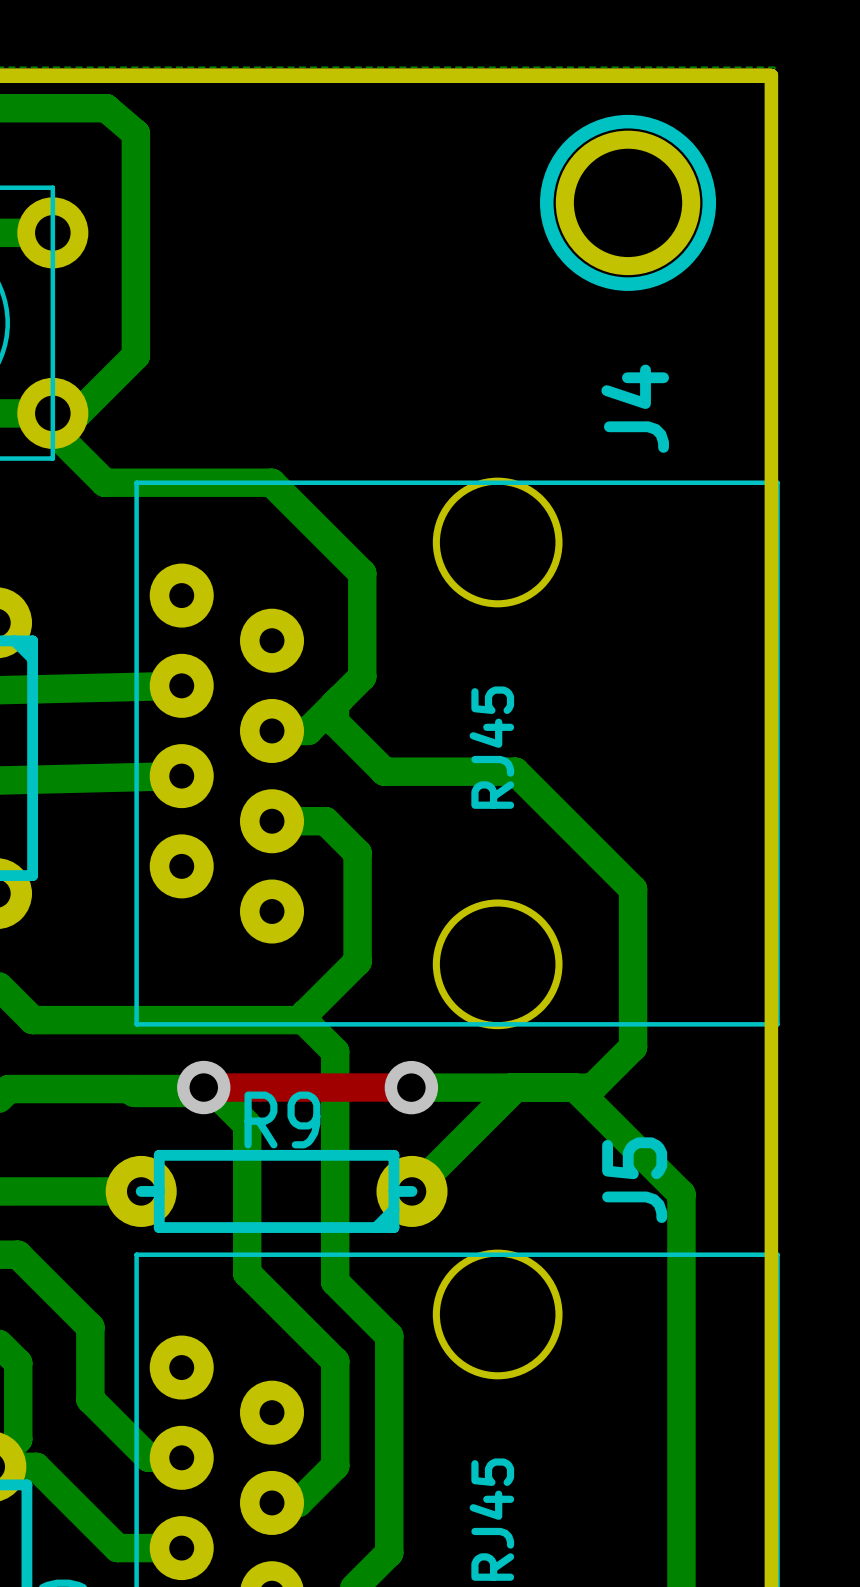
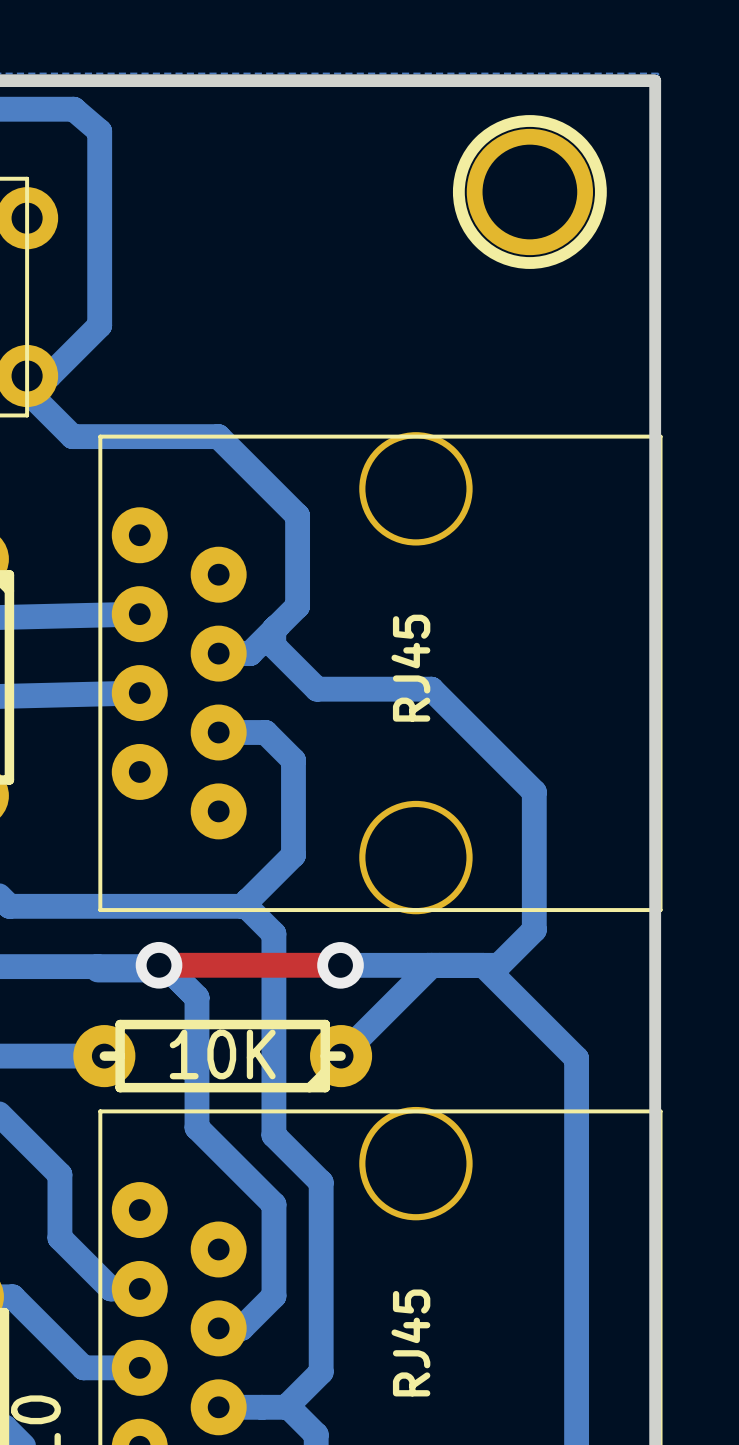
J4 name: J4 (635, 408) -> none
R9 name: R9 (282, 1119) -> none
J5 name: J5 (634, 1180) -> none
R9 value: none -> 10K (222, 1054)

